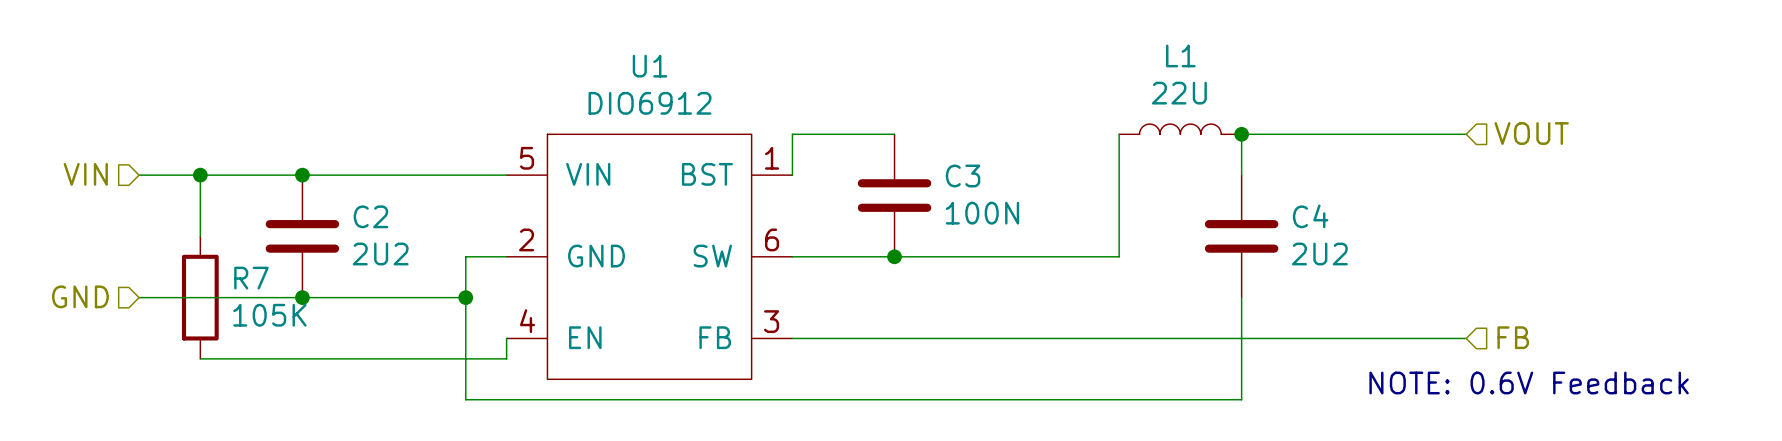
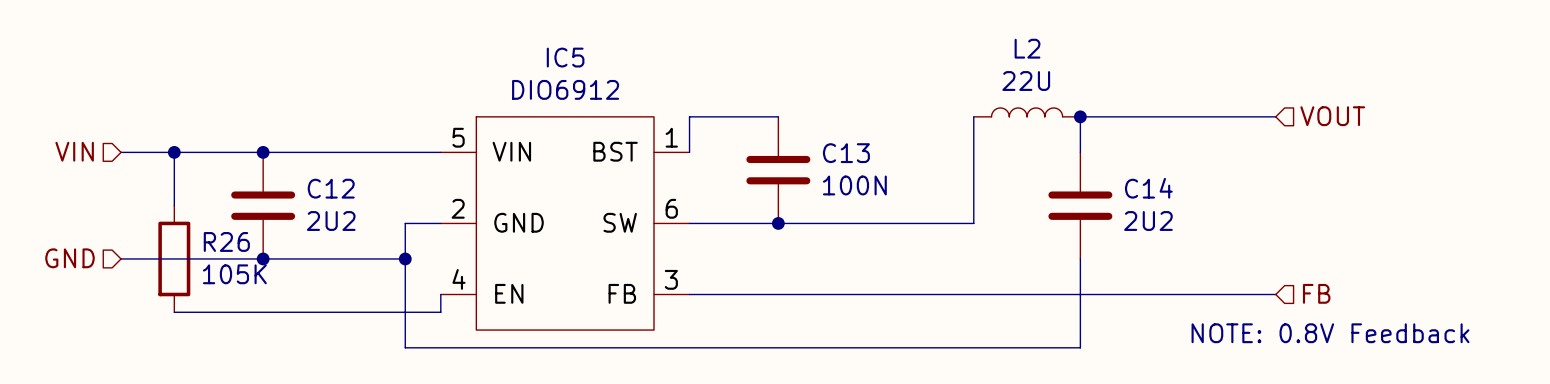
L1 name: L1 (1180, 55) -> L2 (1027, 48)
U1 name: U1 (650, 66) -> IC5 (565, 57)
C3 name: C3 (963, 176) -> C13 (846, 153)
C2 name: C2 (370, 216) -> C12 (331, 188)
C4 name: C4 (1310, 216) -> C14 (1148, 188)
R7 name: R7 (251, 278) -> R26 (226, 241)
text: NOTE: 0.6V Feedback (1529, 382) -> NOTE: 0.8V Feedback (1330, 333)

